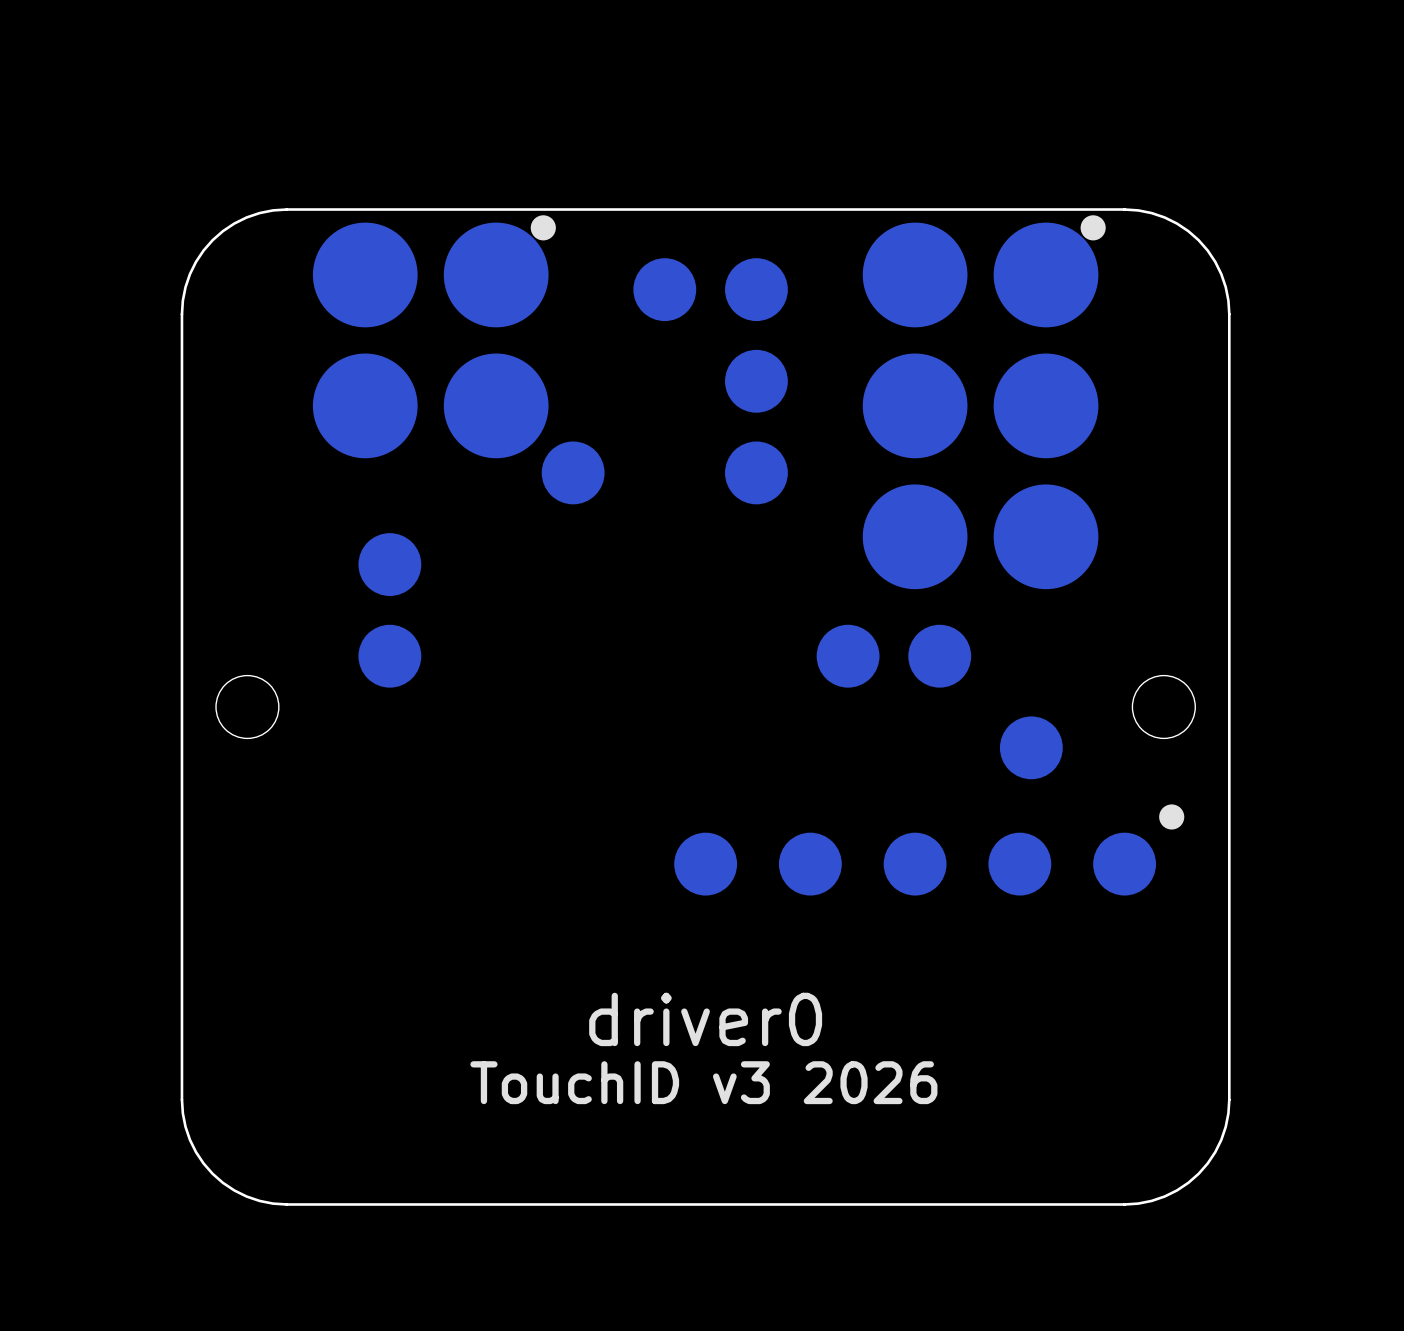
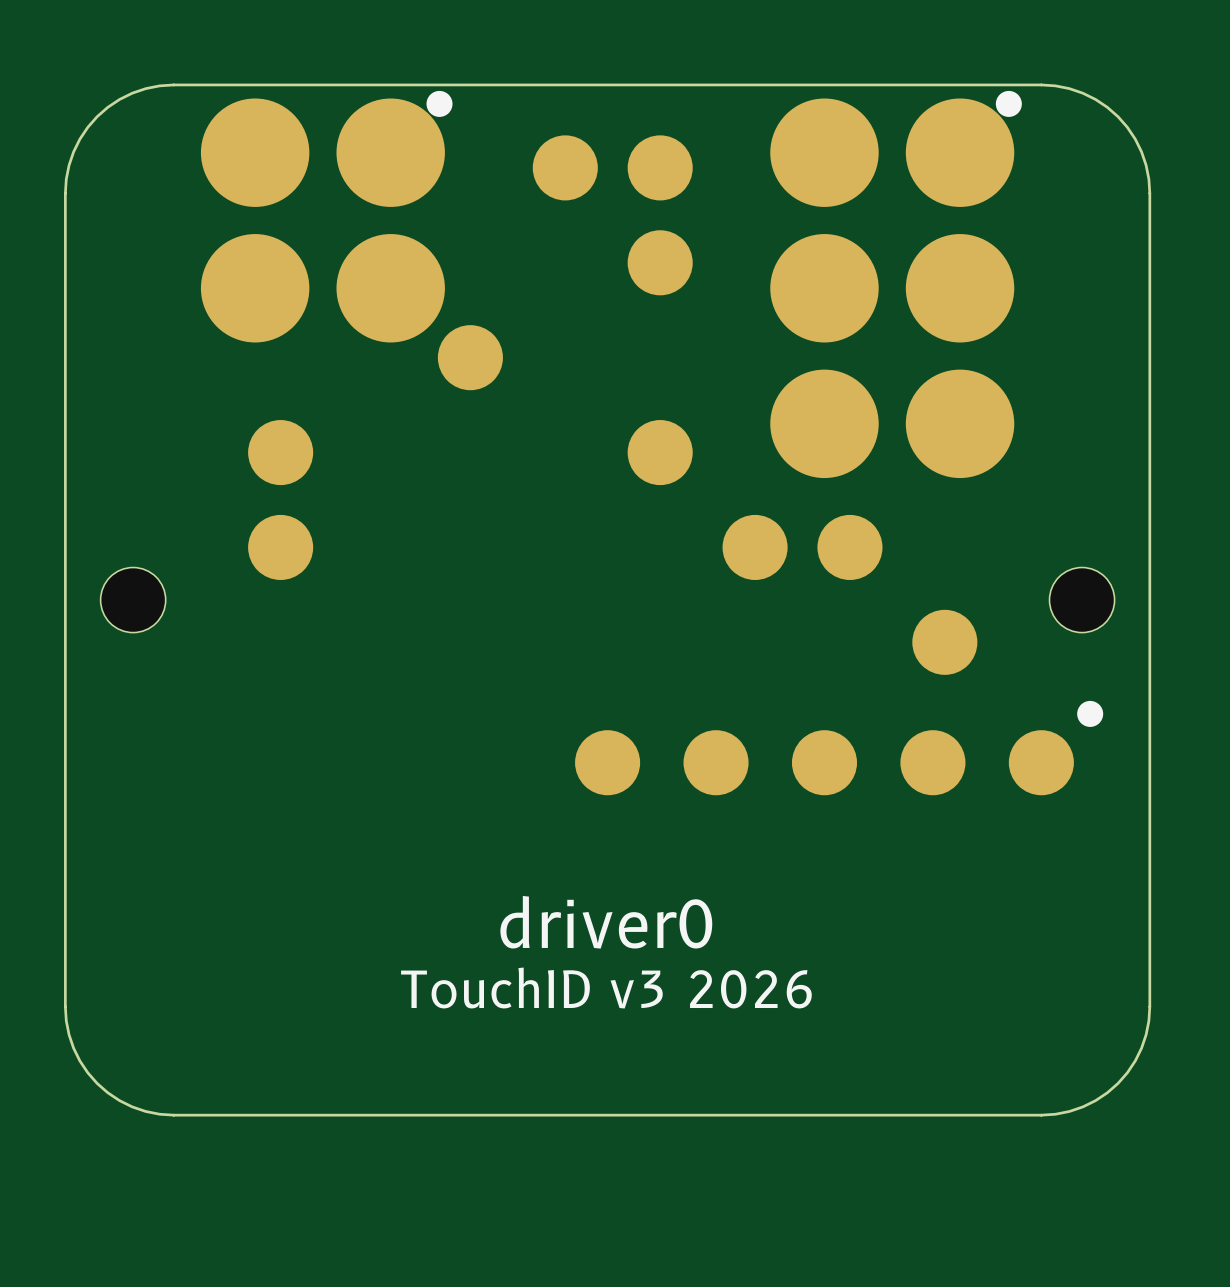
part position: (756, 472) -> (660, 452)

